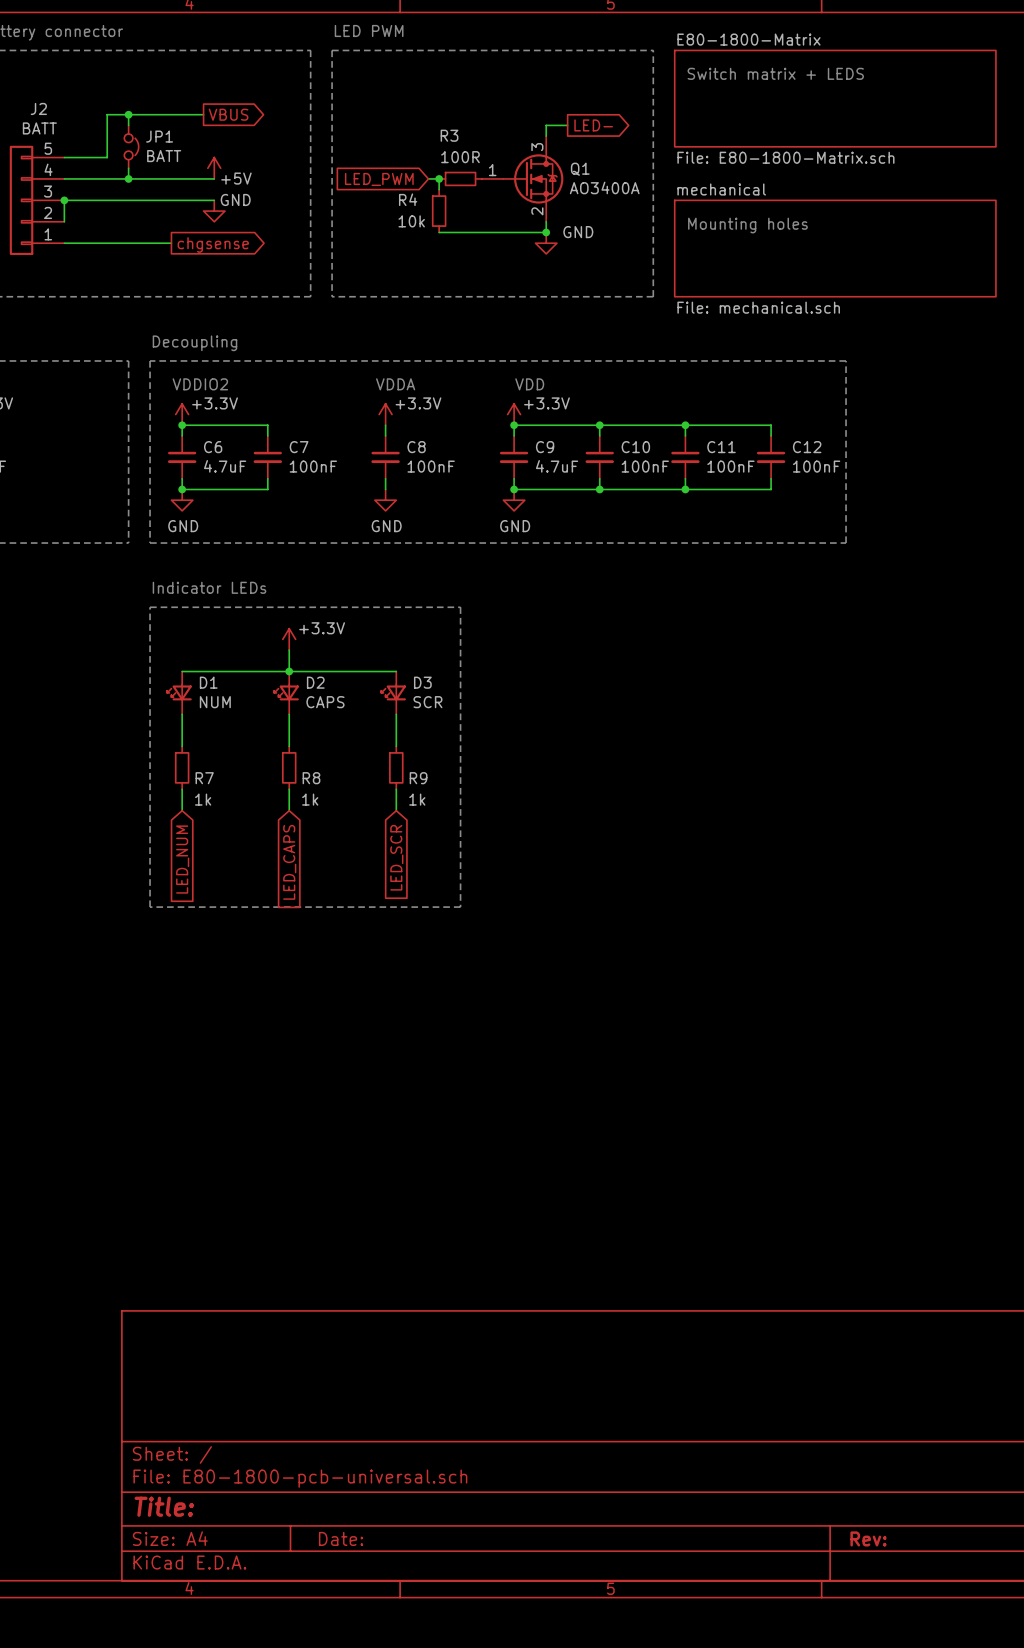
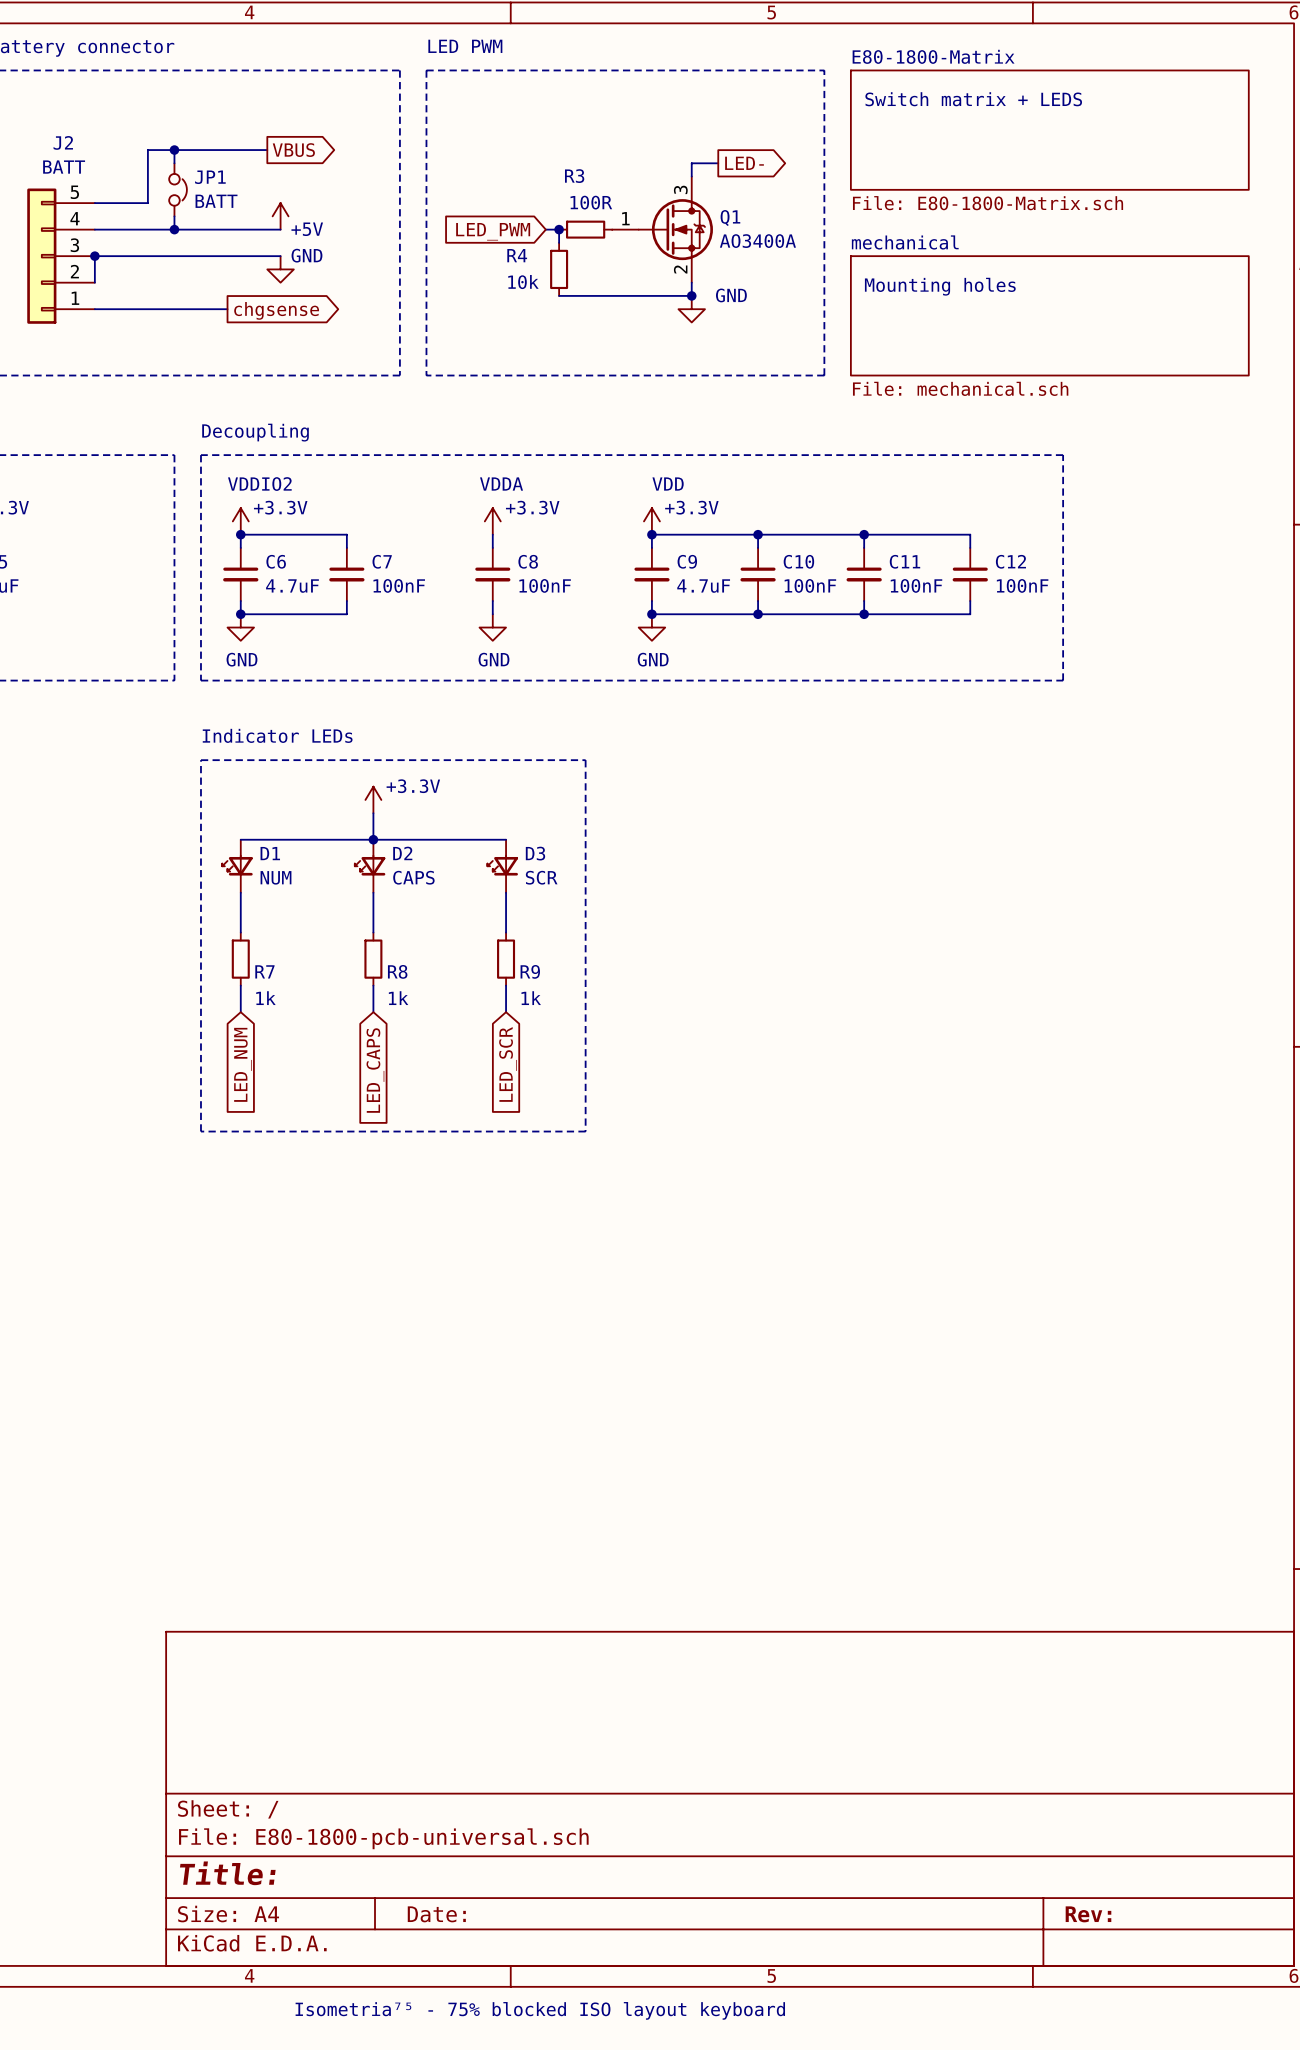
text: none -> Isometria⁷⁵ - 75% blocked ISO layout keyboard (540, 2010)

